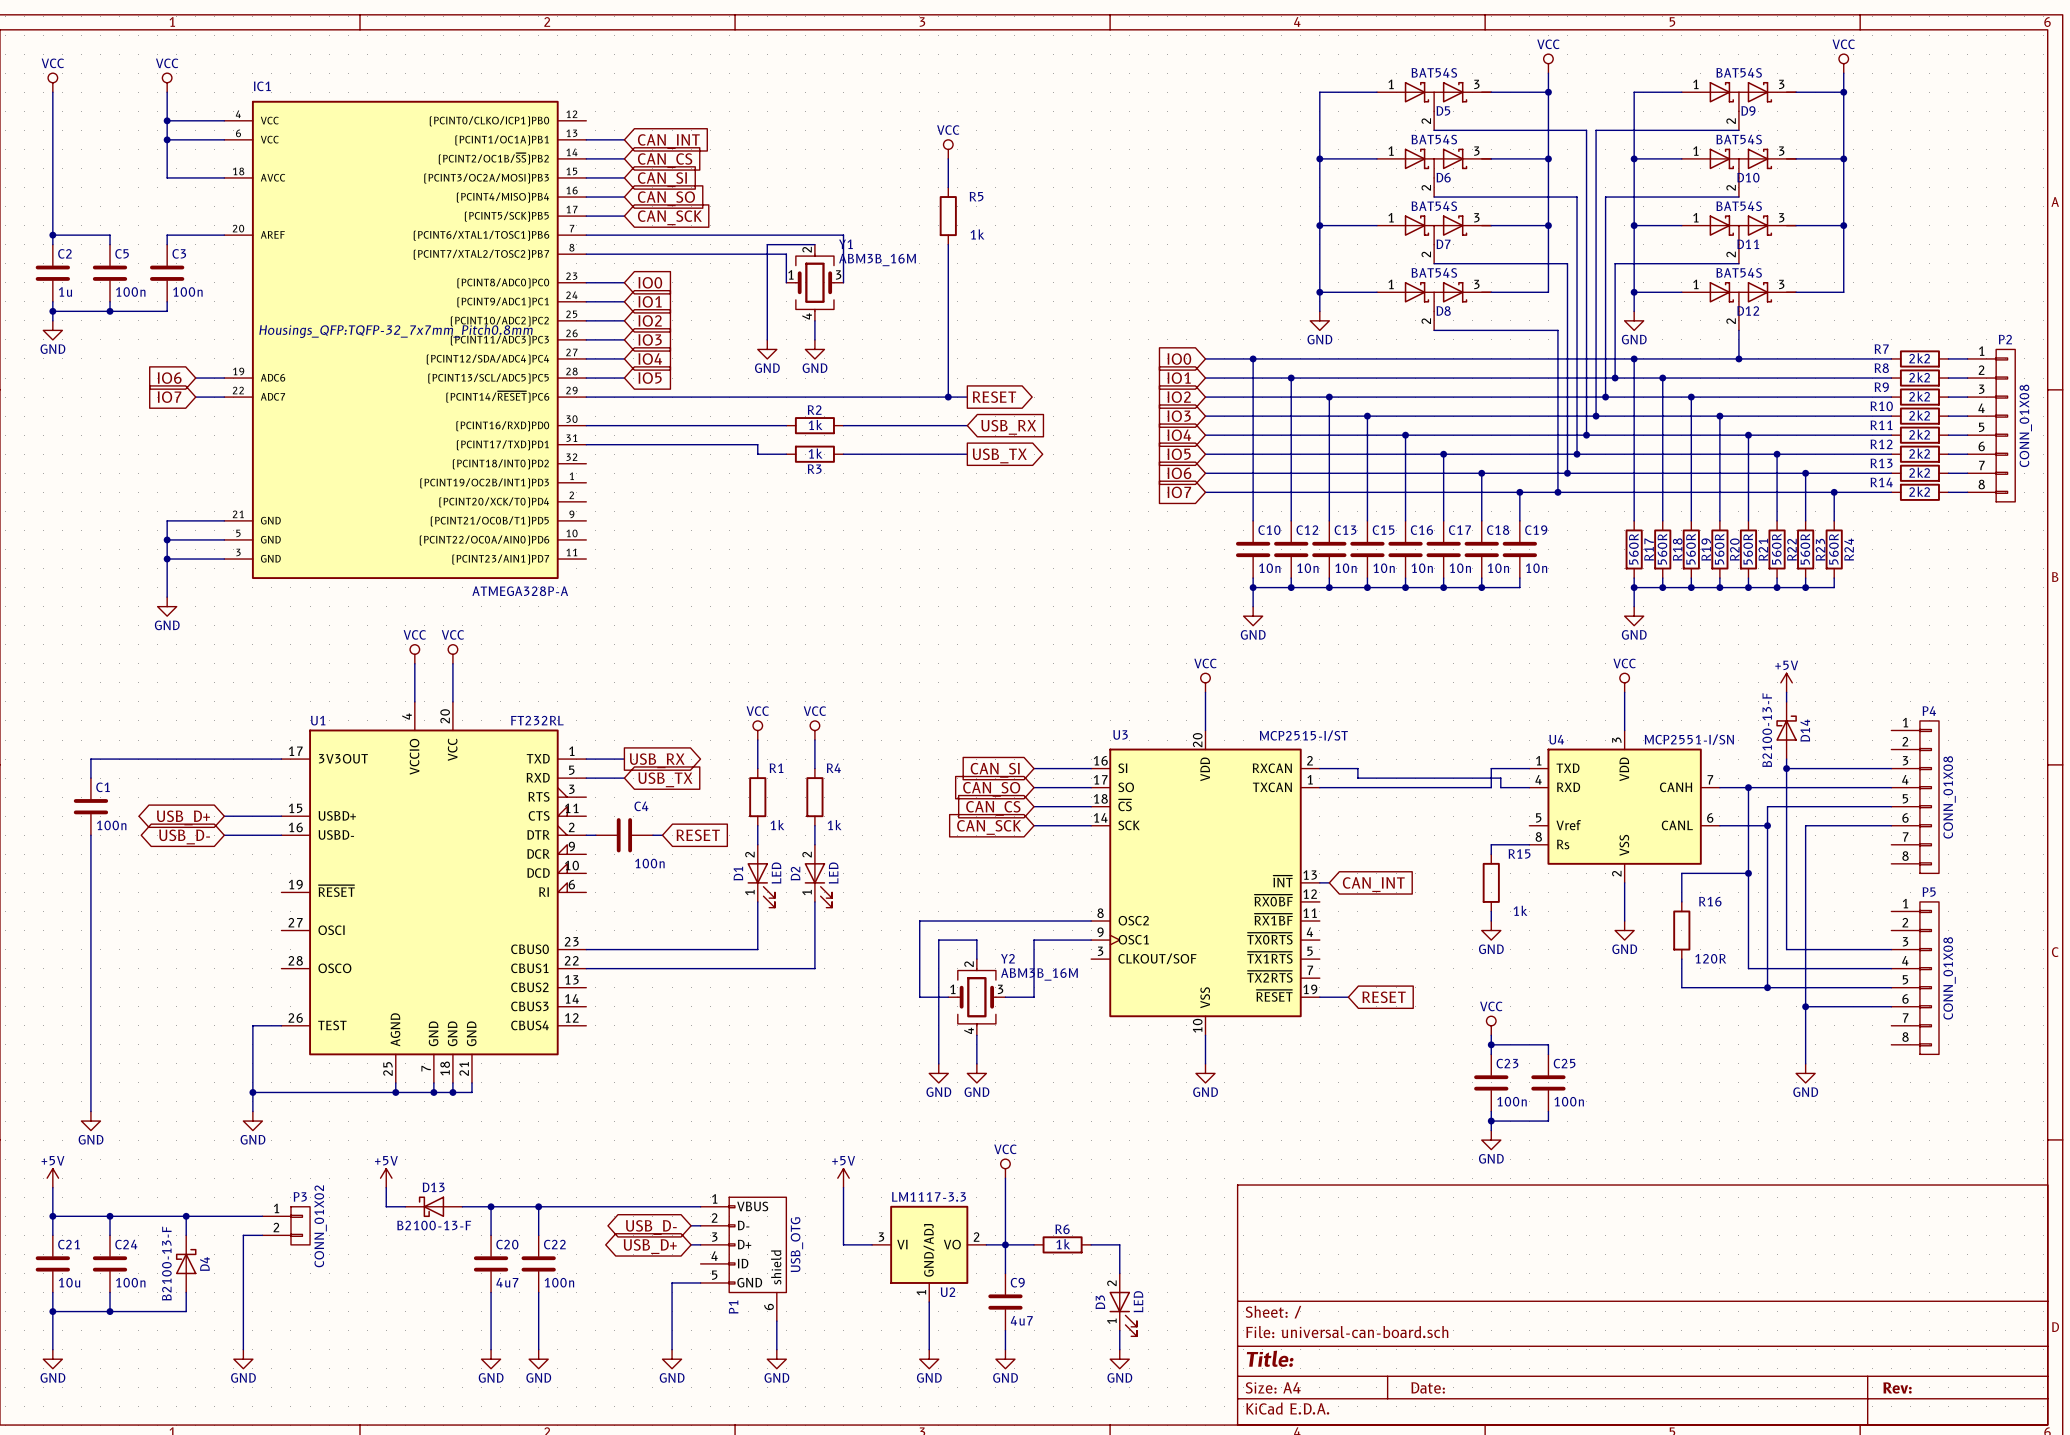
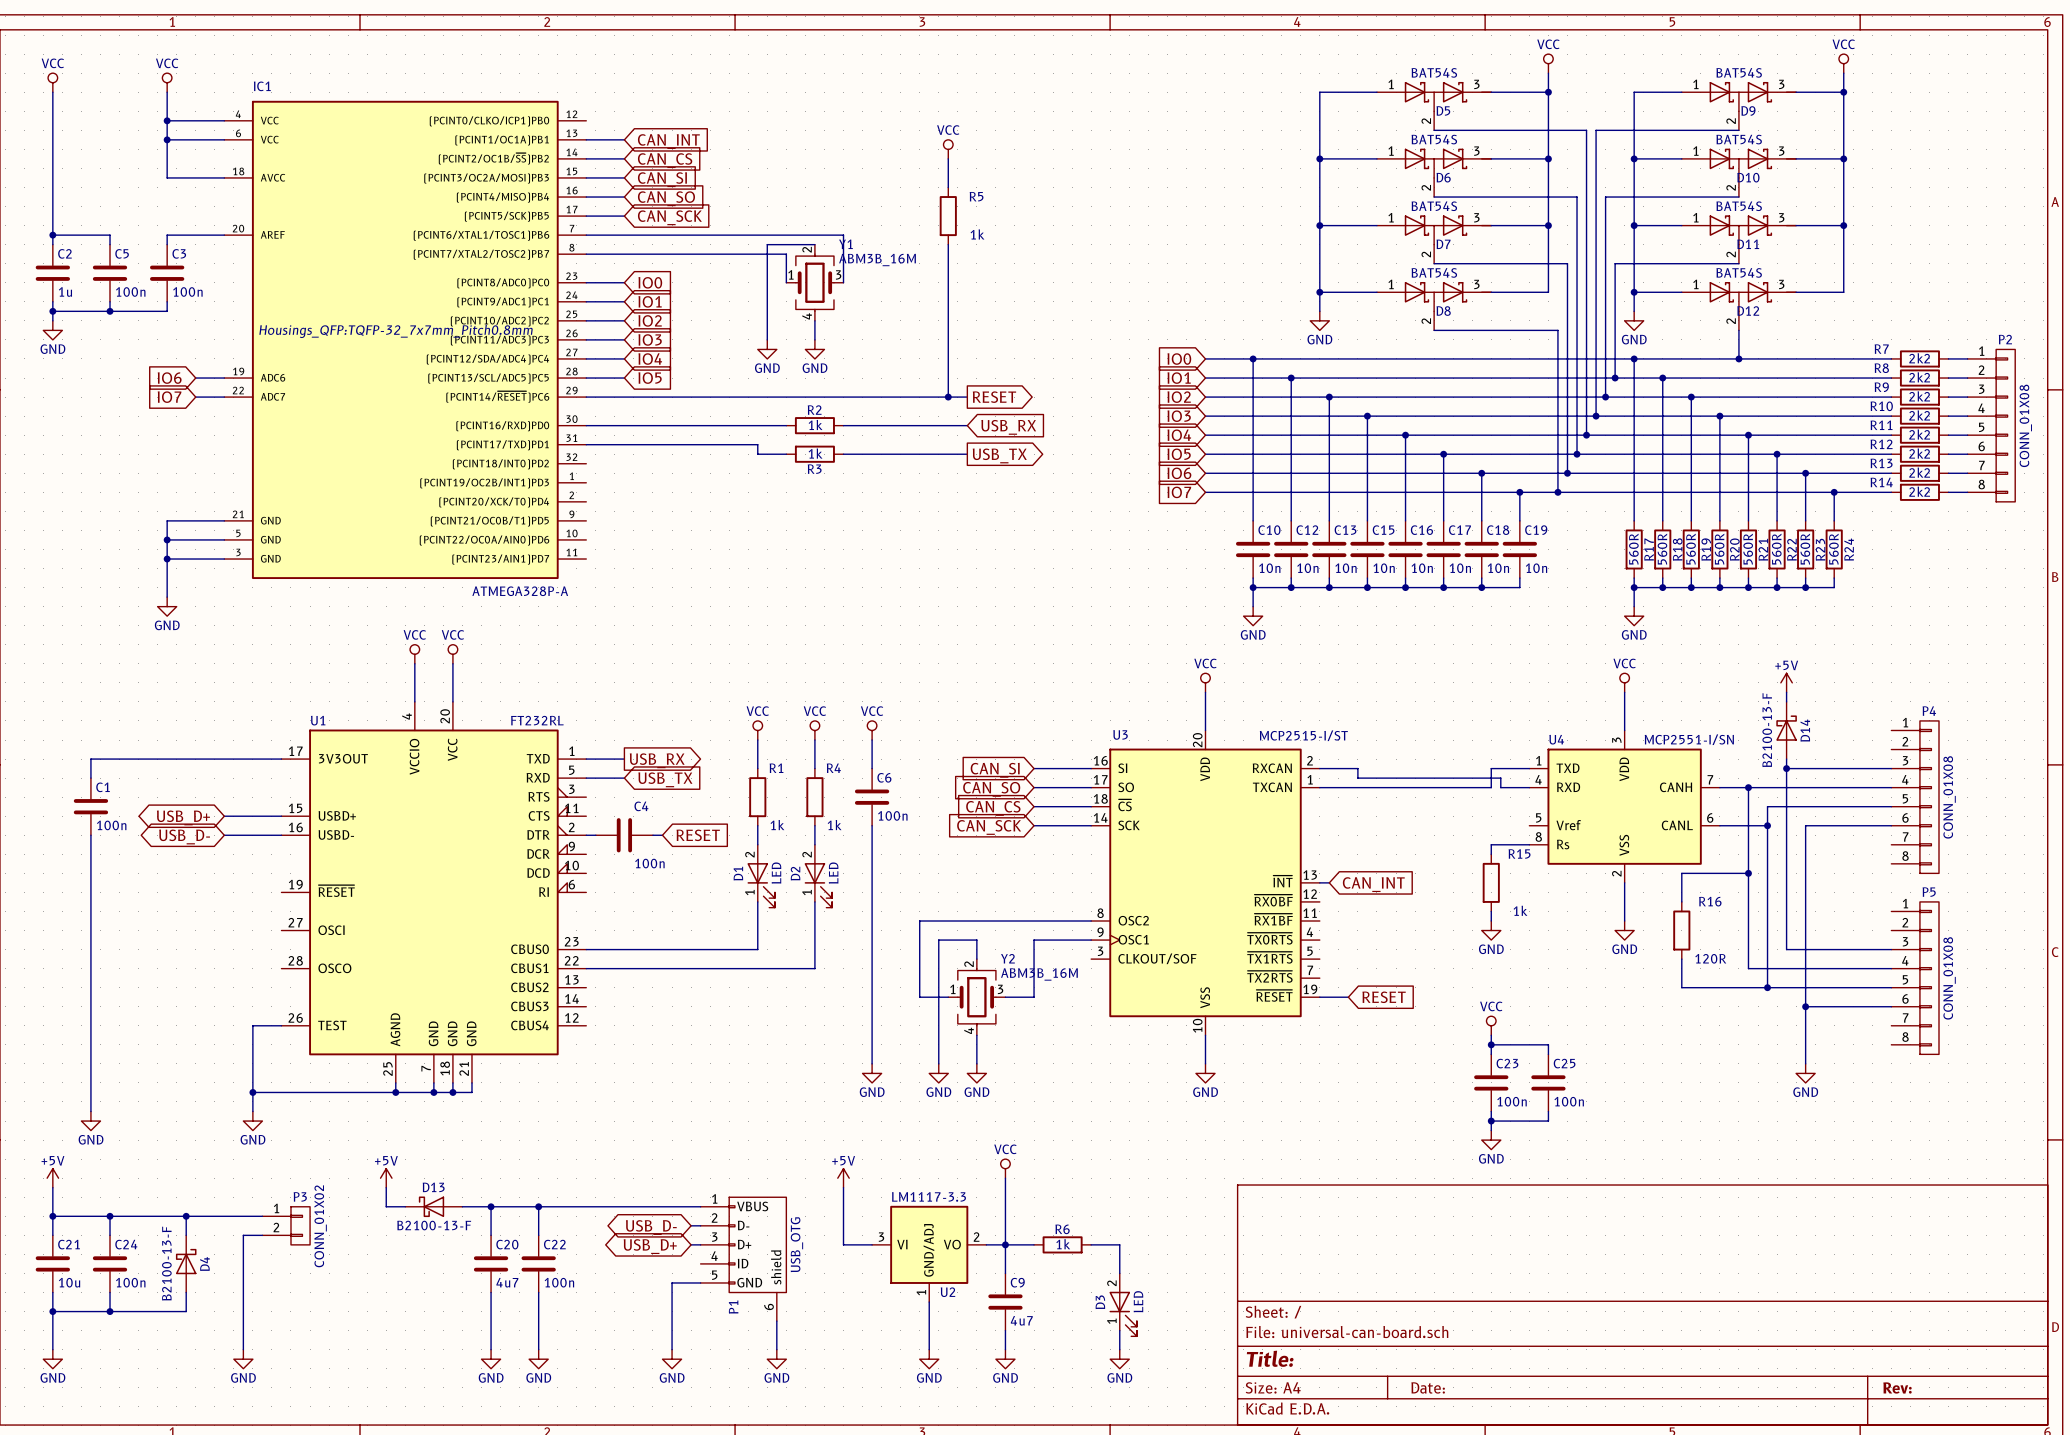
power symbol: none -> VCC (872, 730)
wire: none -> (872, 740) (872, 768)
C6: none -> 100n (872, 797)
wire: none -> (872, 825) (872, 1063)
power symbol: none -> GND (872, 1073)

